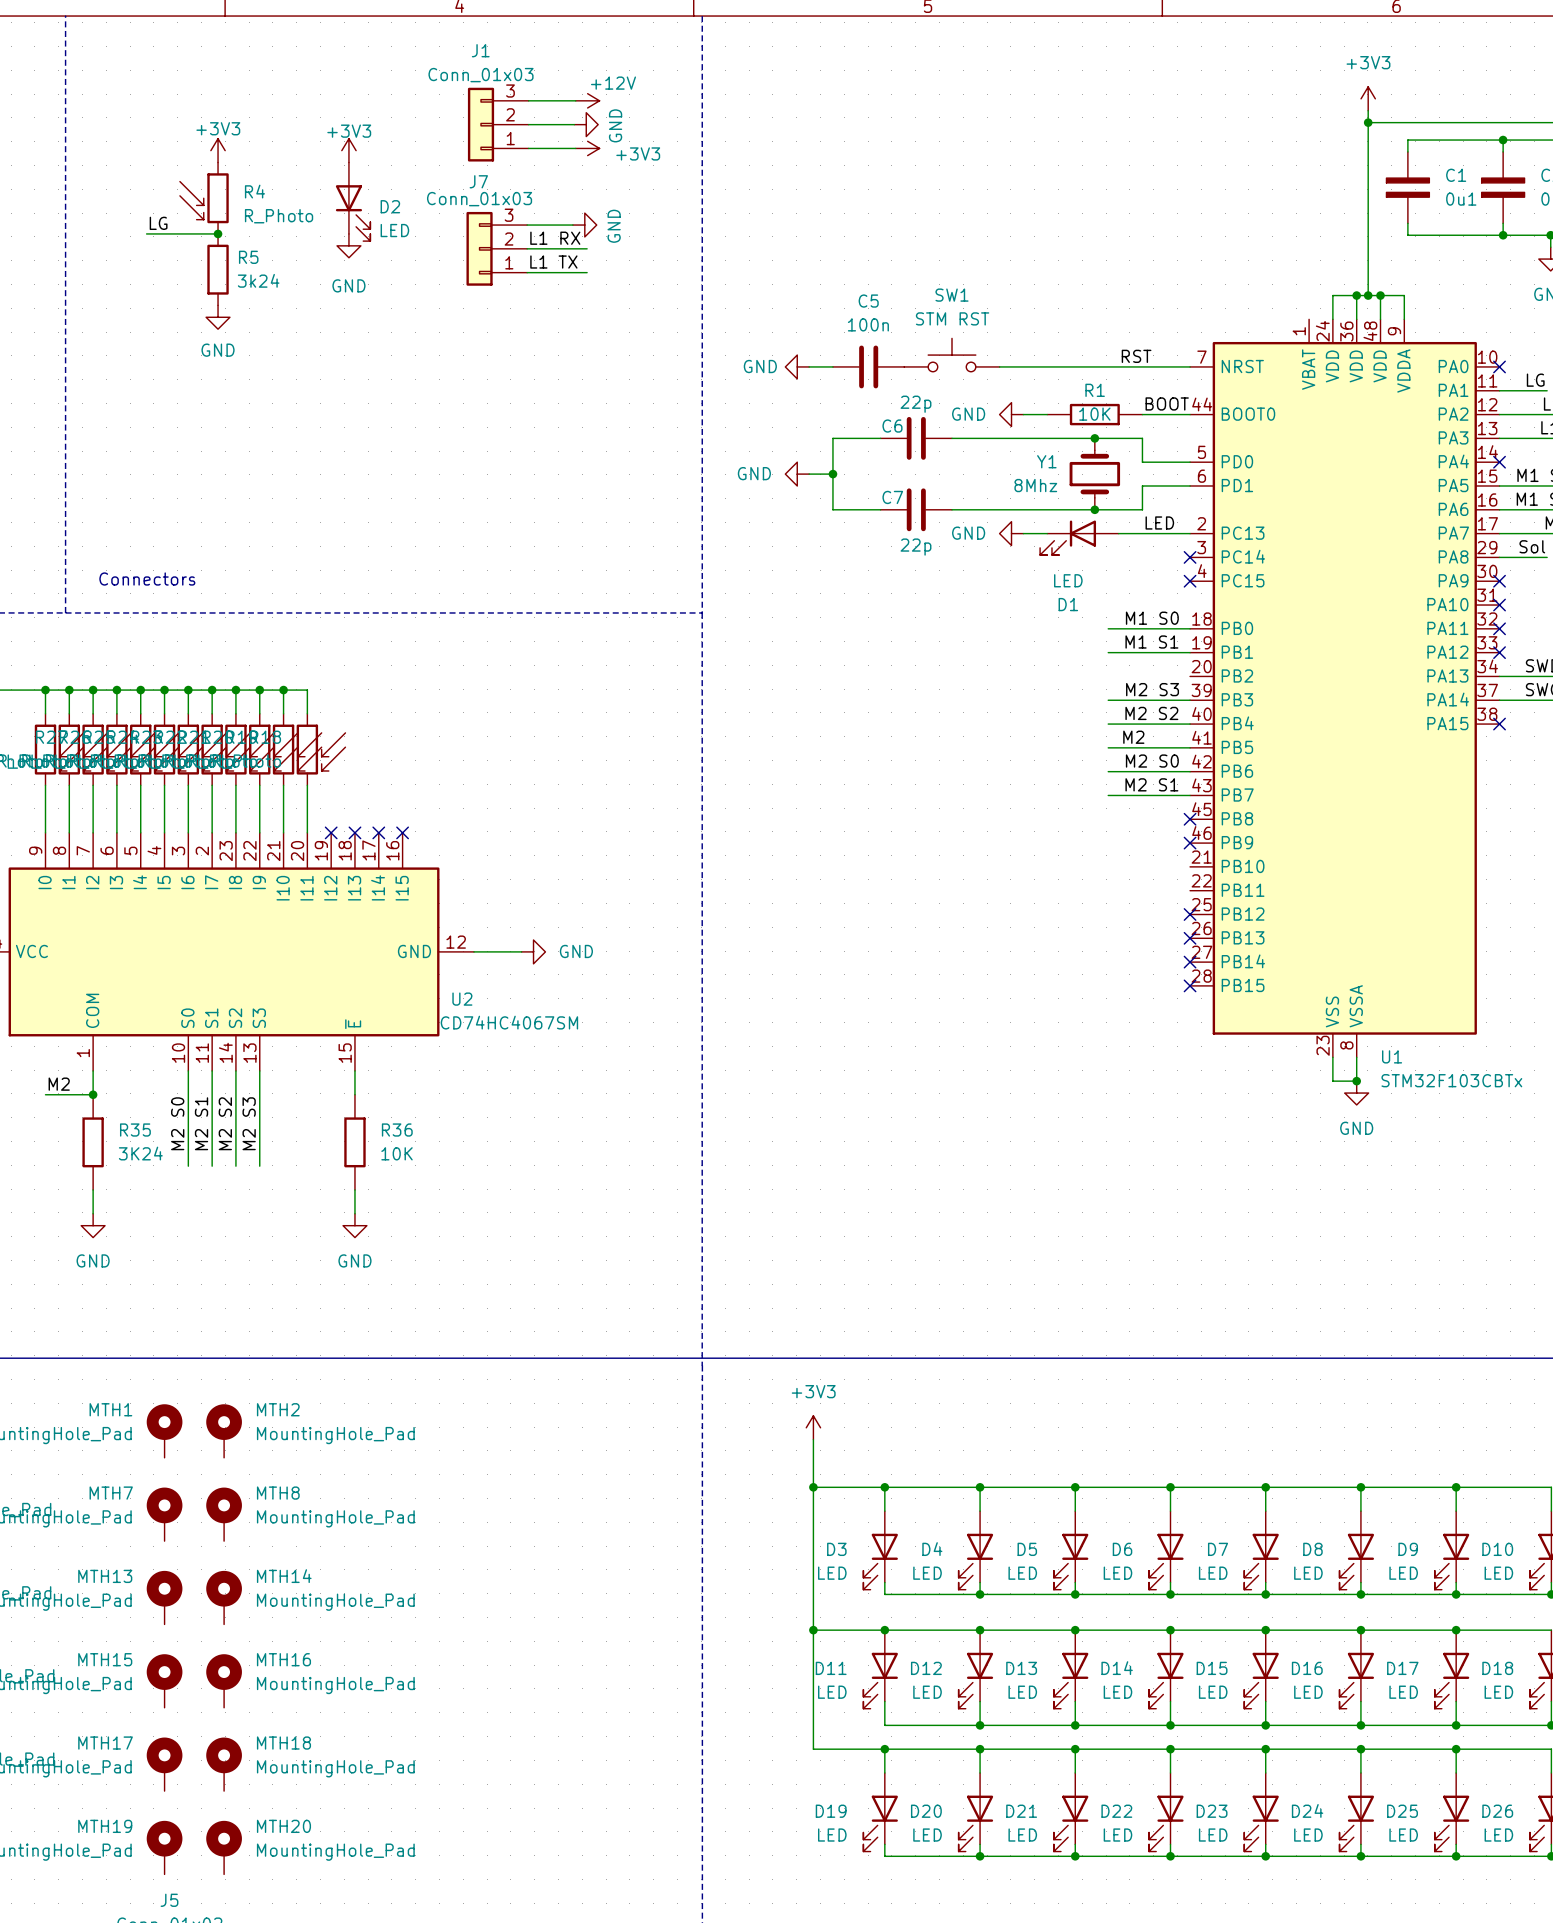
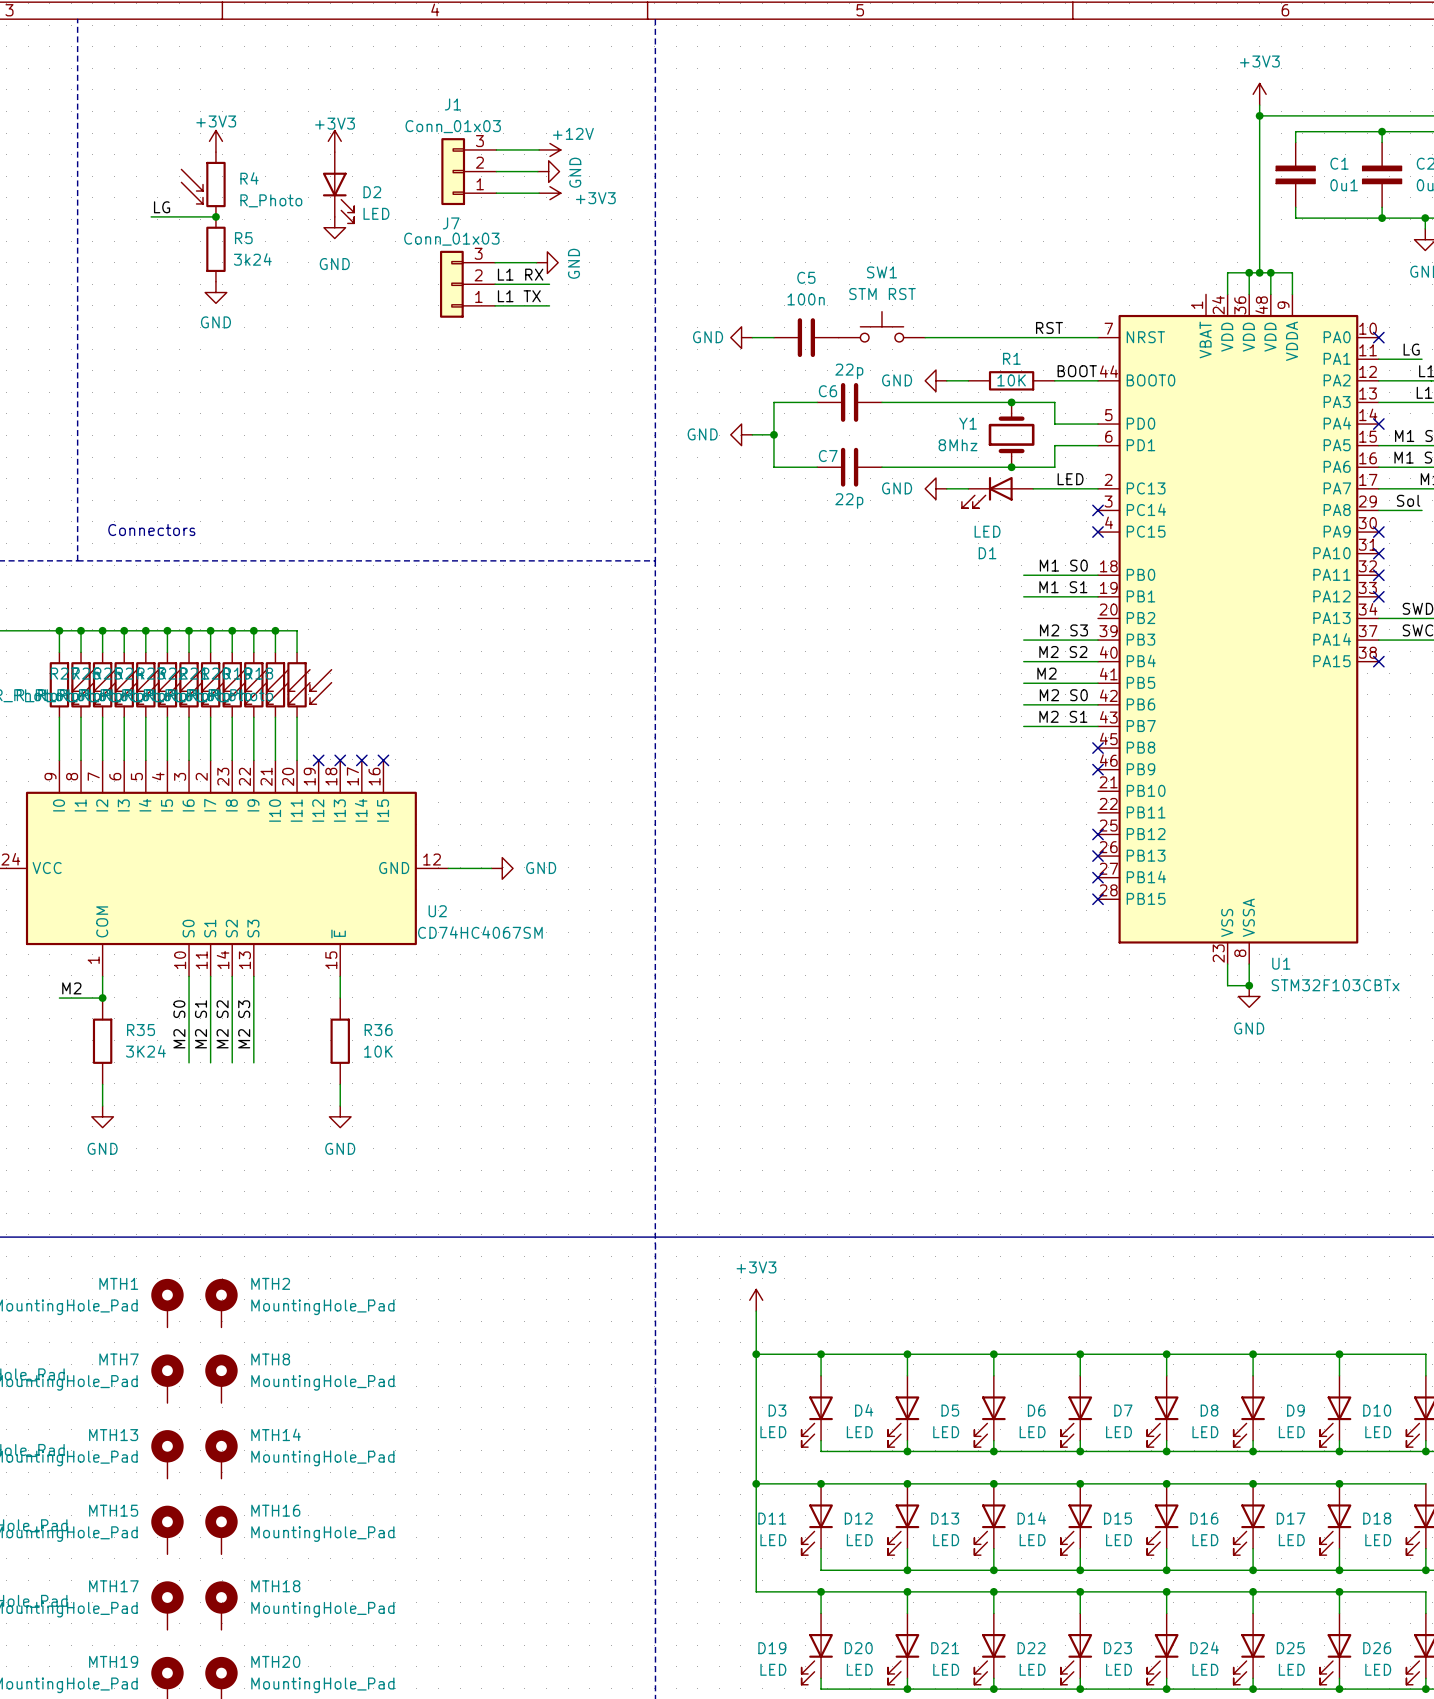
wire: (528, 100) (575, 100) -> (496, 149) (539, 149)
power symbol position: +12V (587, 100) -> +12V (549, 149)
J1 position: (498, 124) -> (468, 171)
wire: (528, 124) (574, 124) -> (496, 171) (537, 171)
power symbol: GND (586, 124) -> none
wire: (528, 148) (575, 148) -> (496, 193) (539, 193)
power symbol position: +3V3 (587, 148) -> +3V3 (549, 193)
power symbol: none -> GND (548, 171)
wire: (527, 225) (572, 225) -> (495, 262) (536, 262)
power symbol: GND (584, 225) -> none
label position: L1 RX (555, 238) -> L1 RX (520, 274)
J7 position: (496, 248) -> (467, 284)
wire: (527, 248) (587, 248) -> (495, 284) (549, 284)
label position: L1 TX (553, 262) -> L1 TX (519, 296)
wire: (527, 272) (587, 272) -> (495, 305) (549, 305)
power symbol: none -> GND (547, 262)

